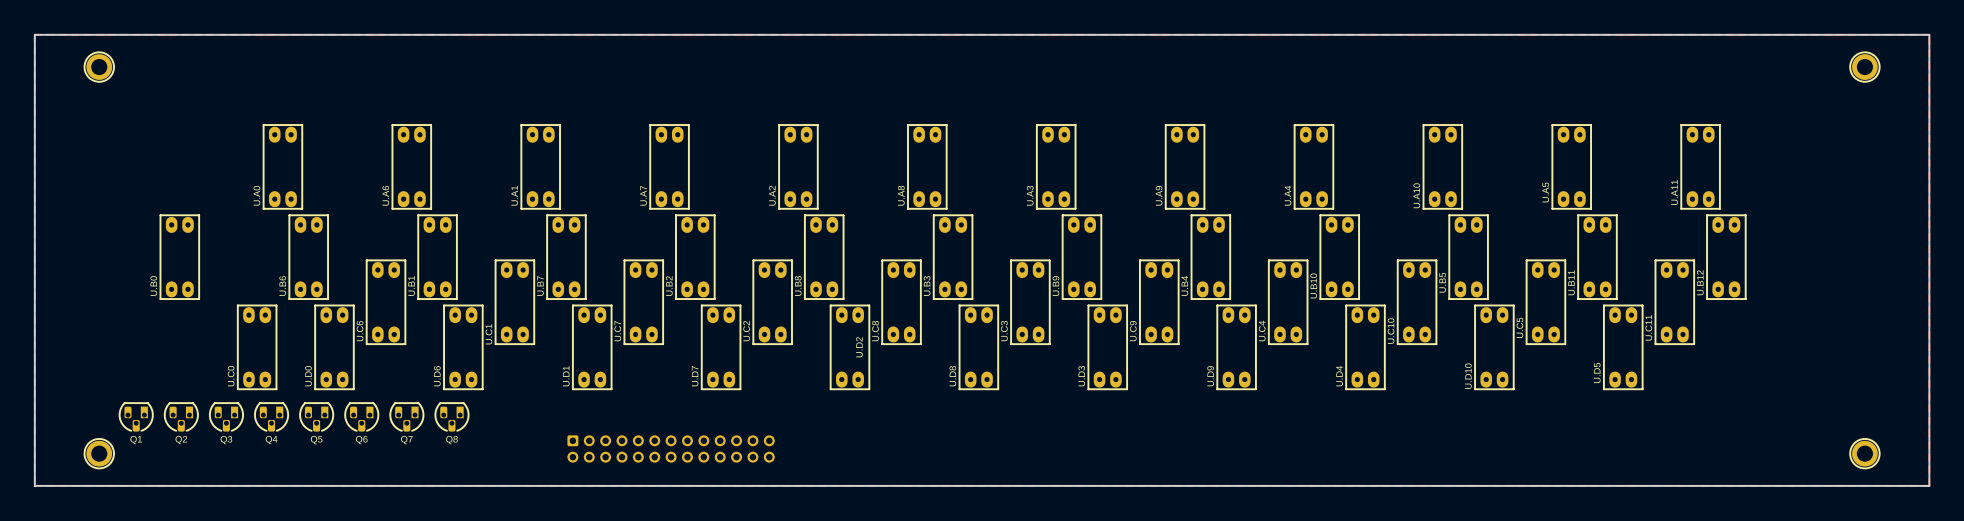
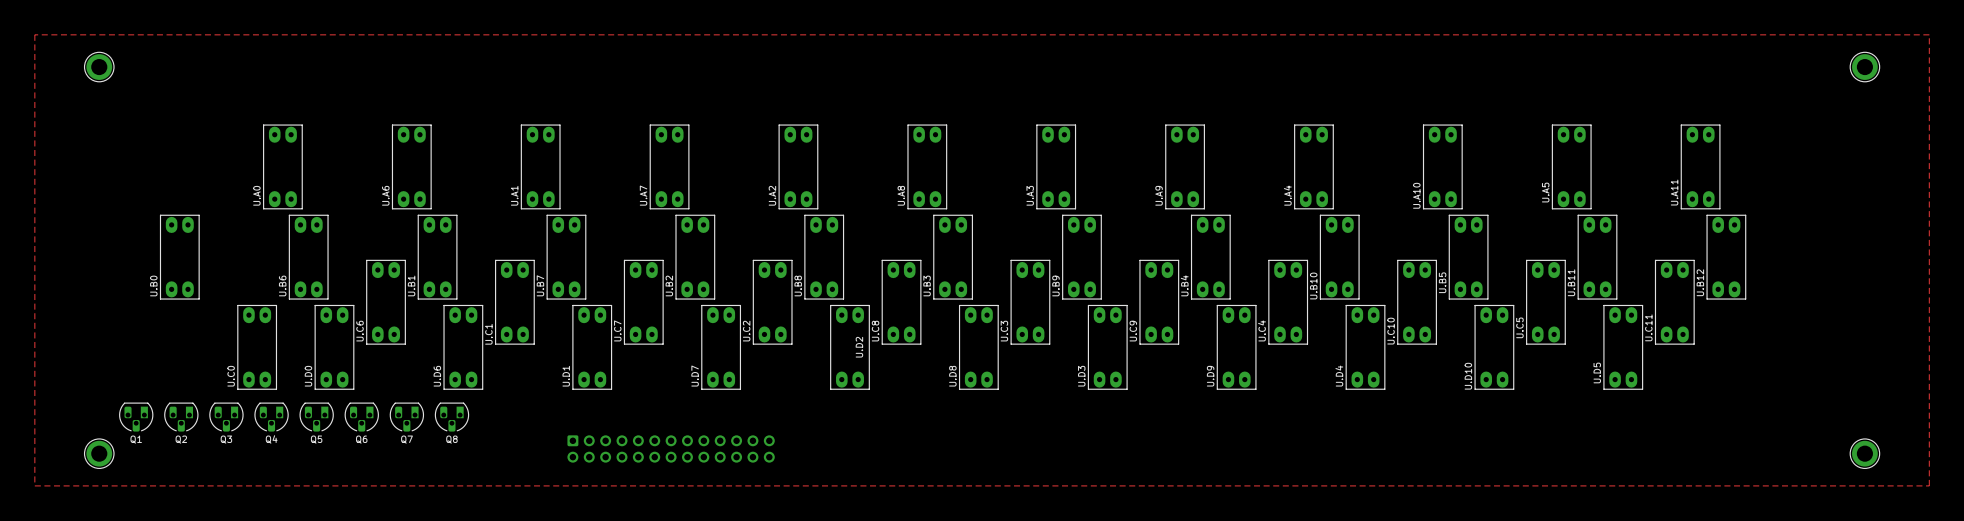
board edge: (34, 34) (34, 485) (1929, 485) (1929, 34) (34, 34) -> none

